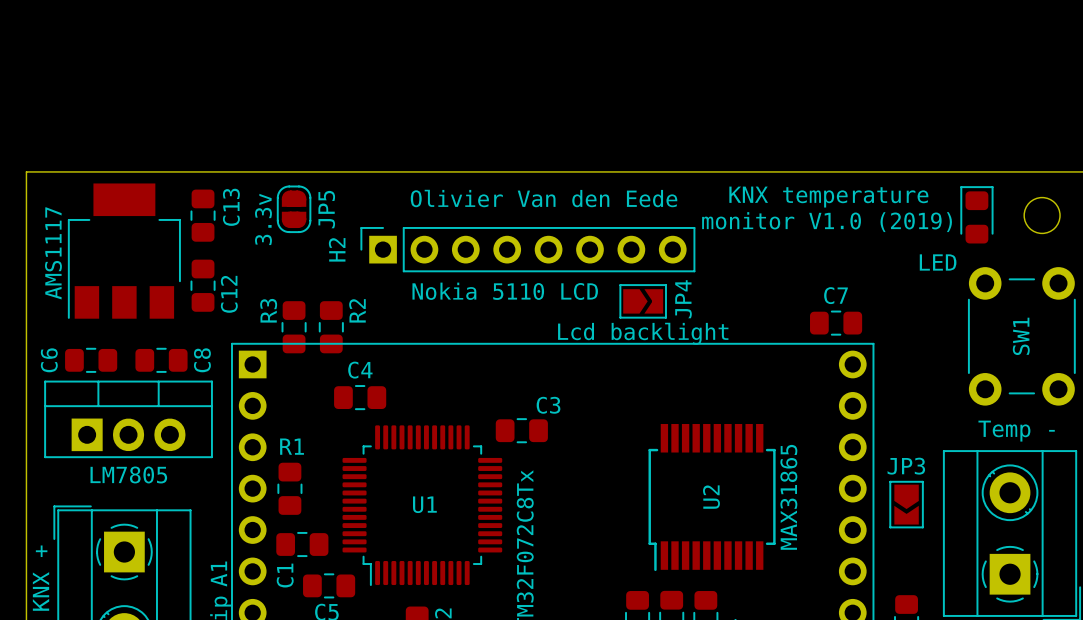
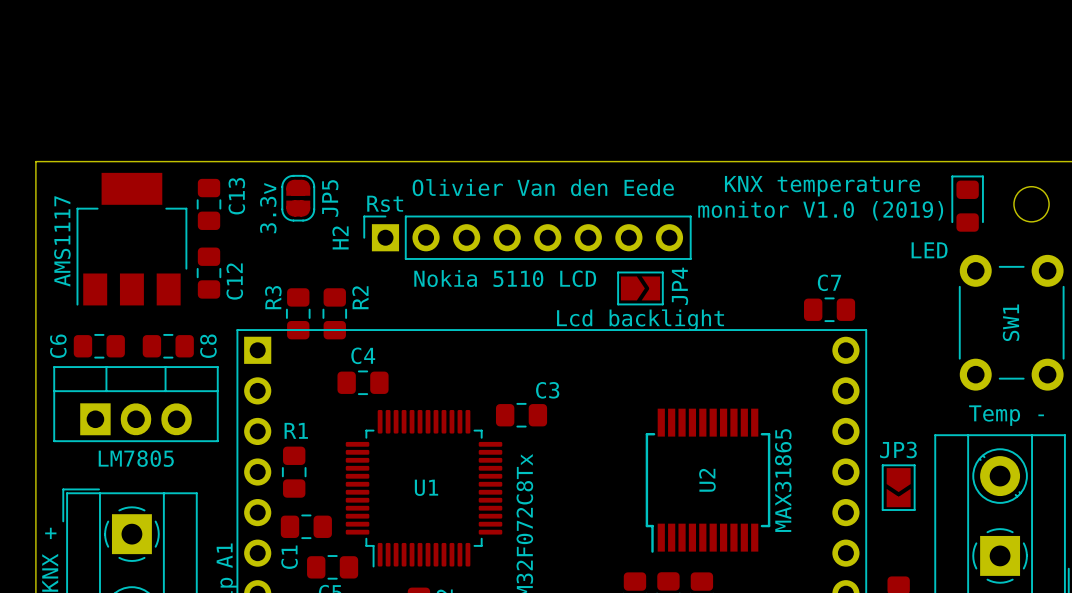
text: none -> Rst (385, 203)

